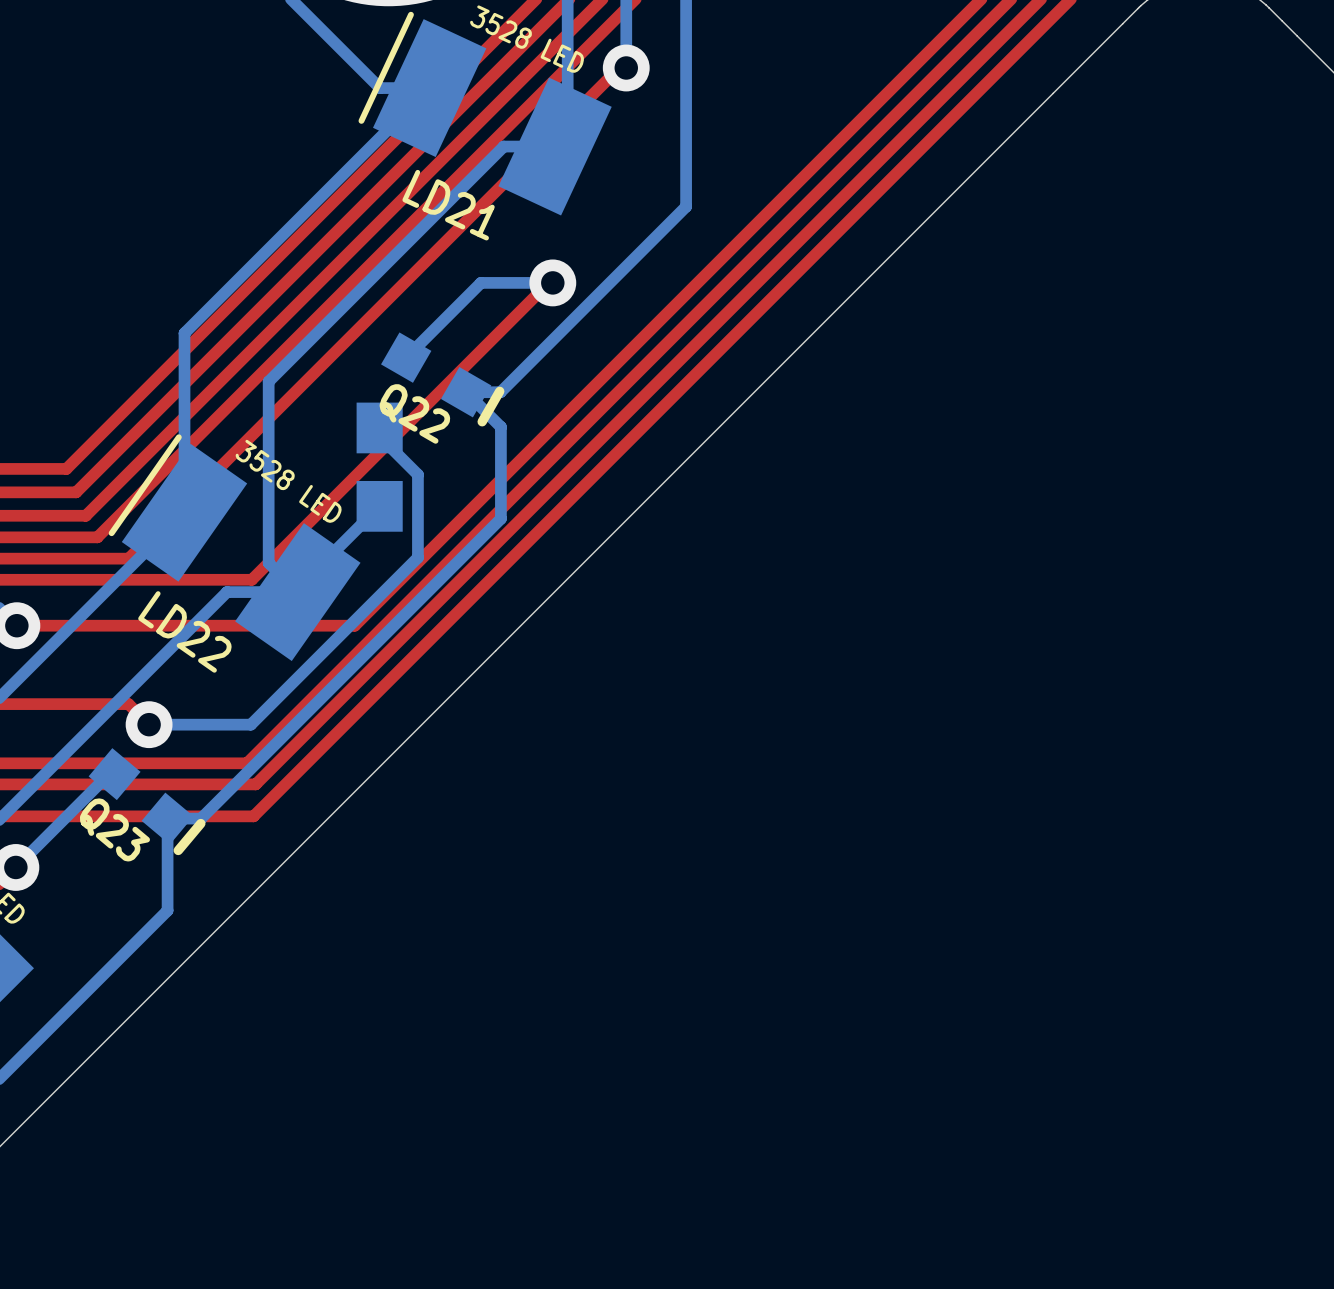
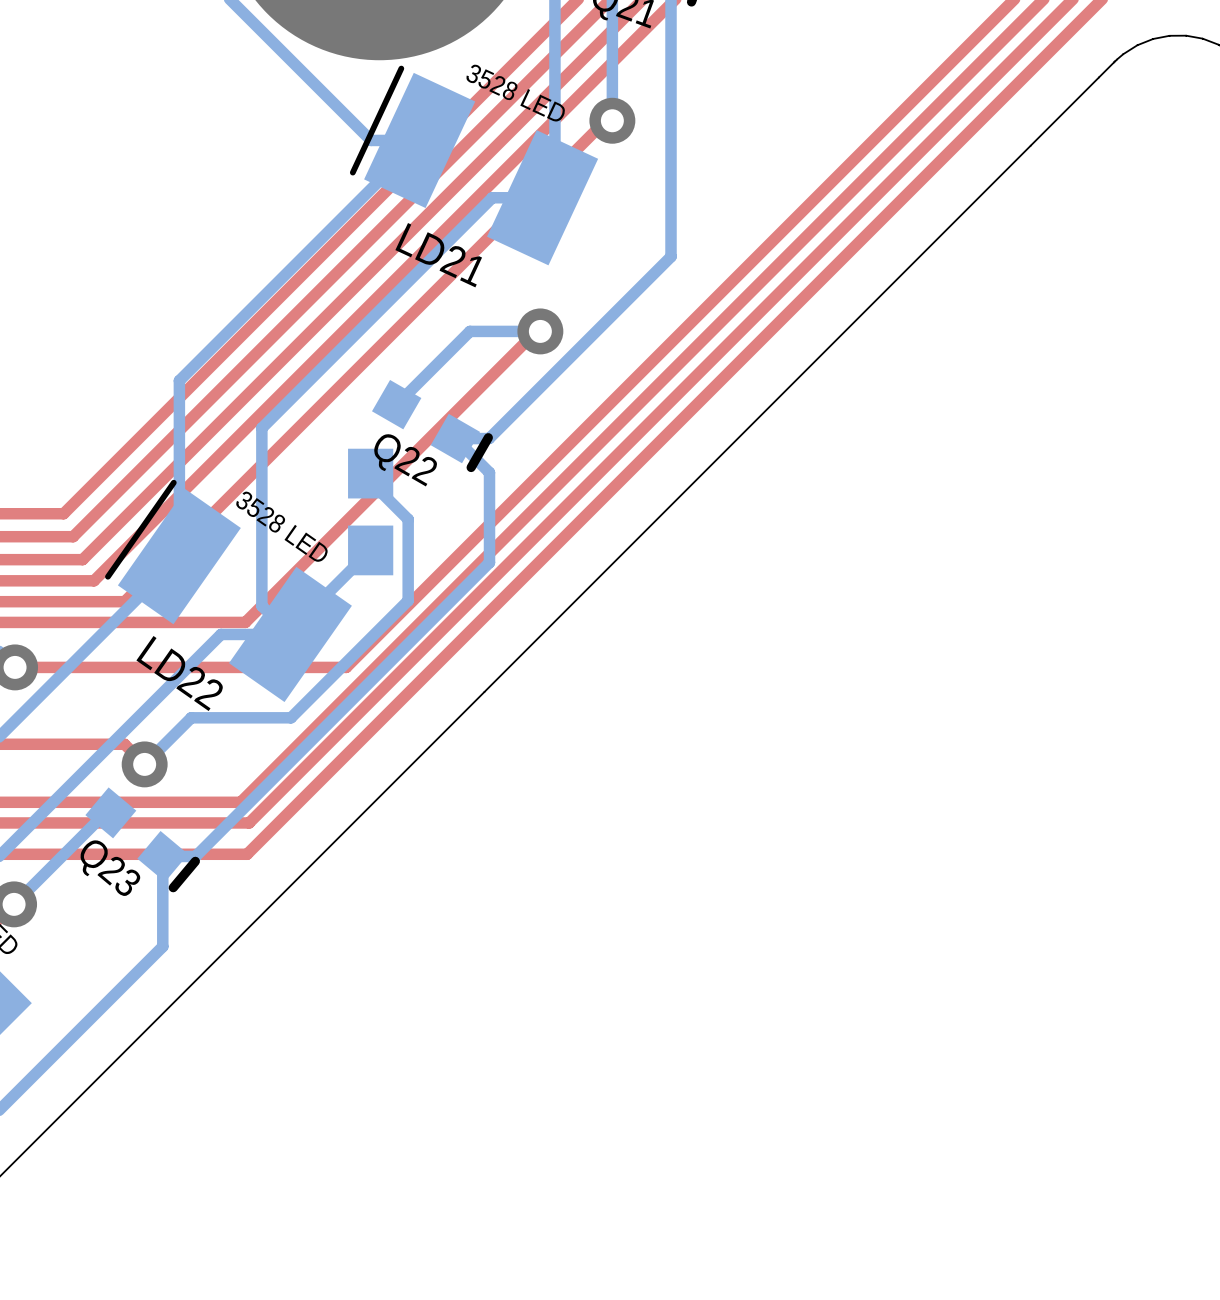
bottom track: (298, 677) (250, 724) (149, 724) -> (291, 717) (191, 717) (144, 764)

